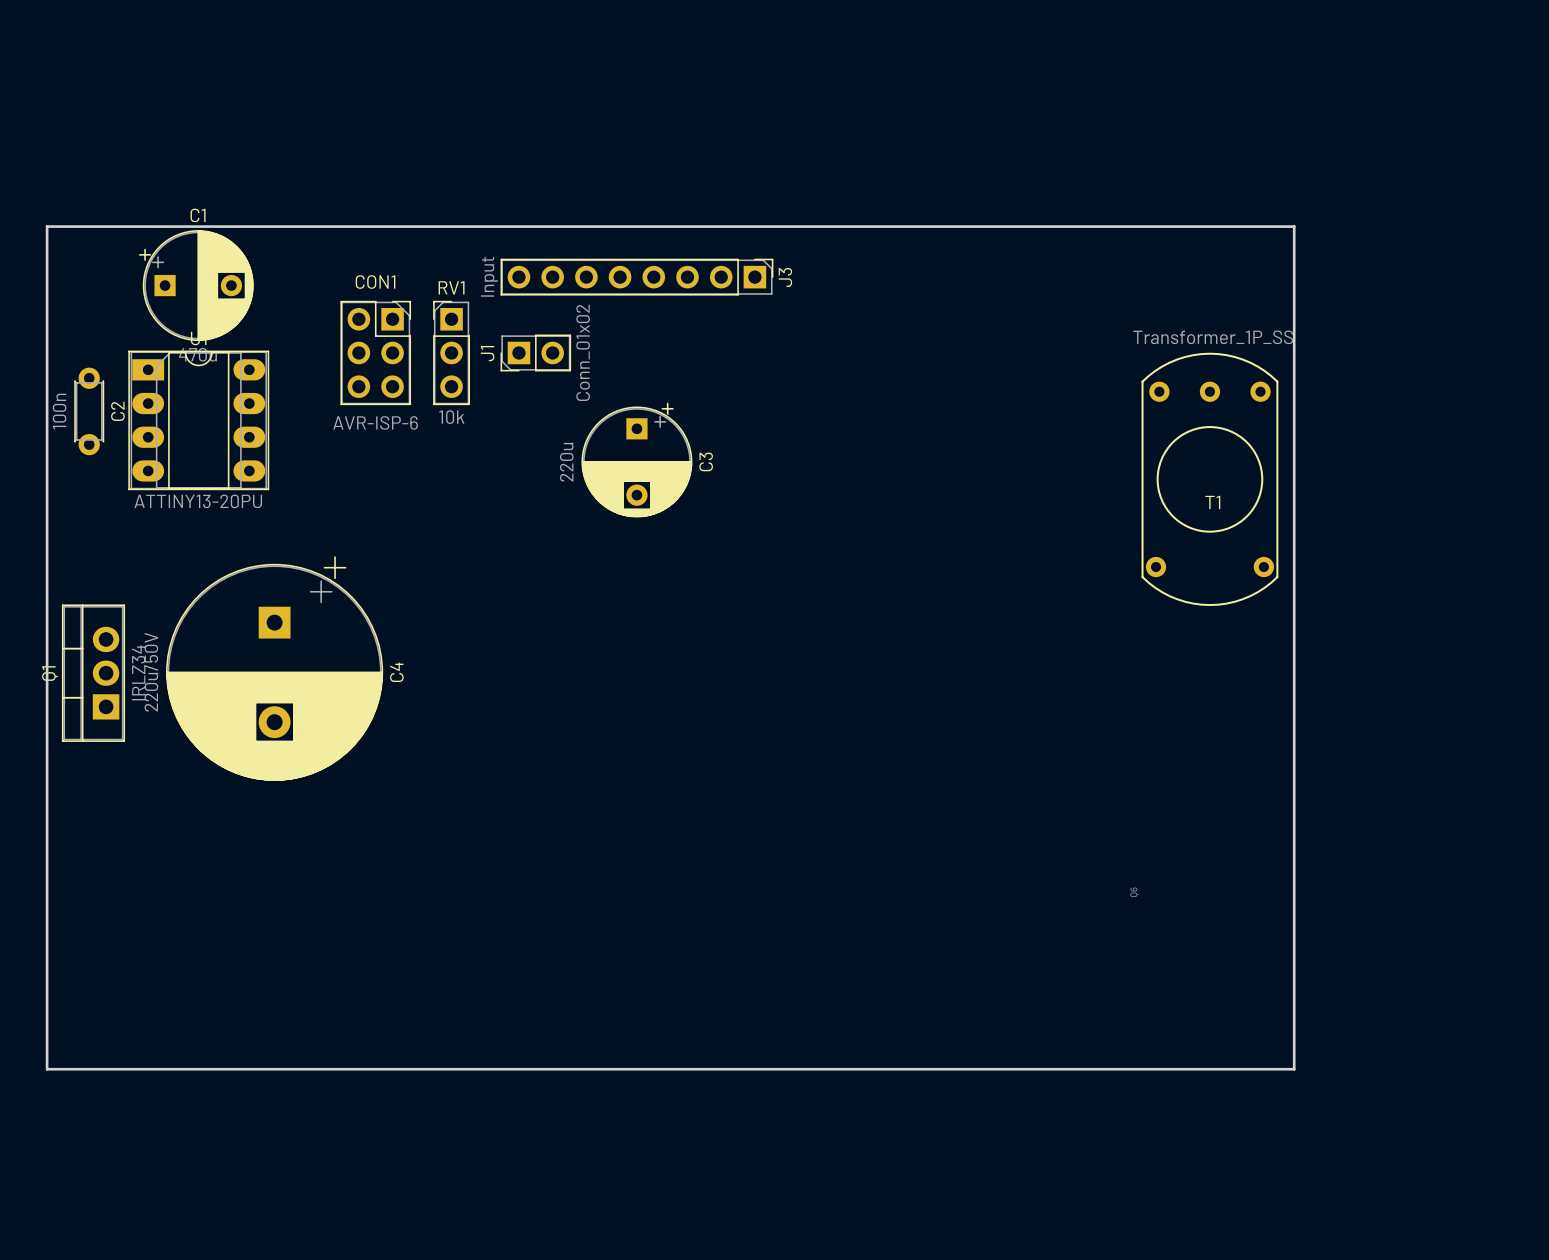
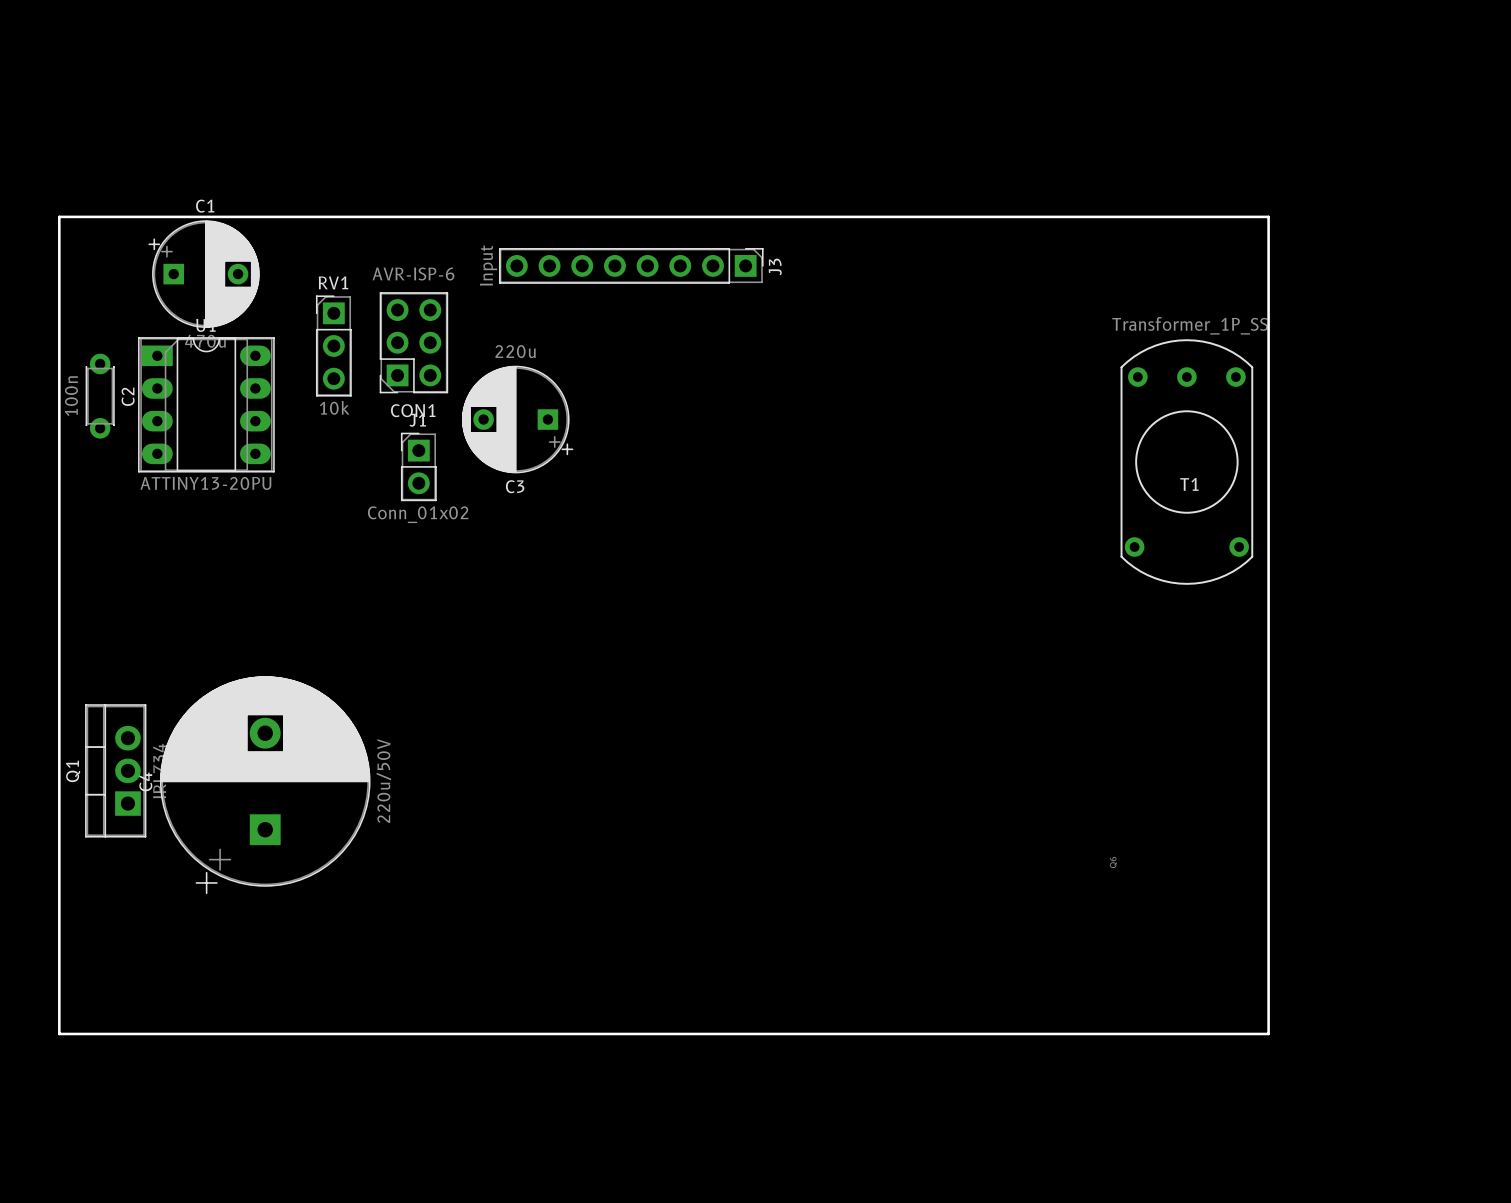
CON1 rotation: 0° (375, 352) -> 180° (413, 342)
RV1 position: (451, 352) -> (333, 346)
J1 rotation: 0° (535, 352) -> 90° clockwise (418, 466)
J1 position: (535, 352) -> (418, 466)
C3 rotation: 0° (636, 460) -> 90° clockwise (517, 419)
C3 position: (636, 460) -> (517, 419)
C4 rotation: 0° (274, 668) -> 180° (265, 785)
C4 position: (274, 668) -> (265, 785)
Q1 position: (93, 673) -> (115, 770)

